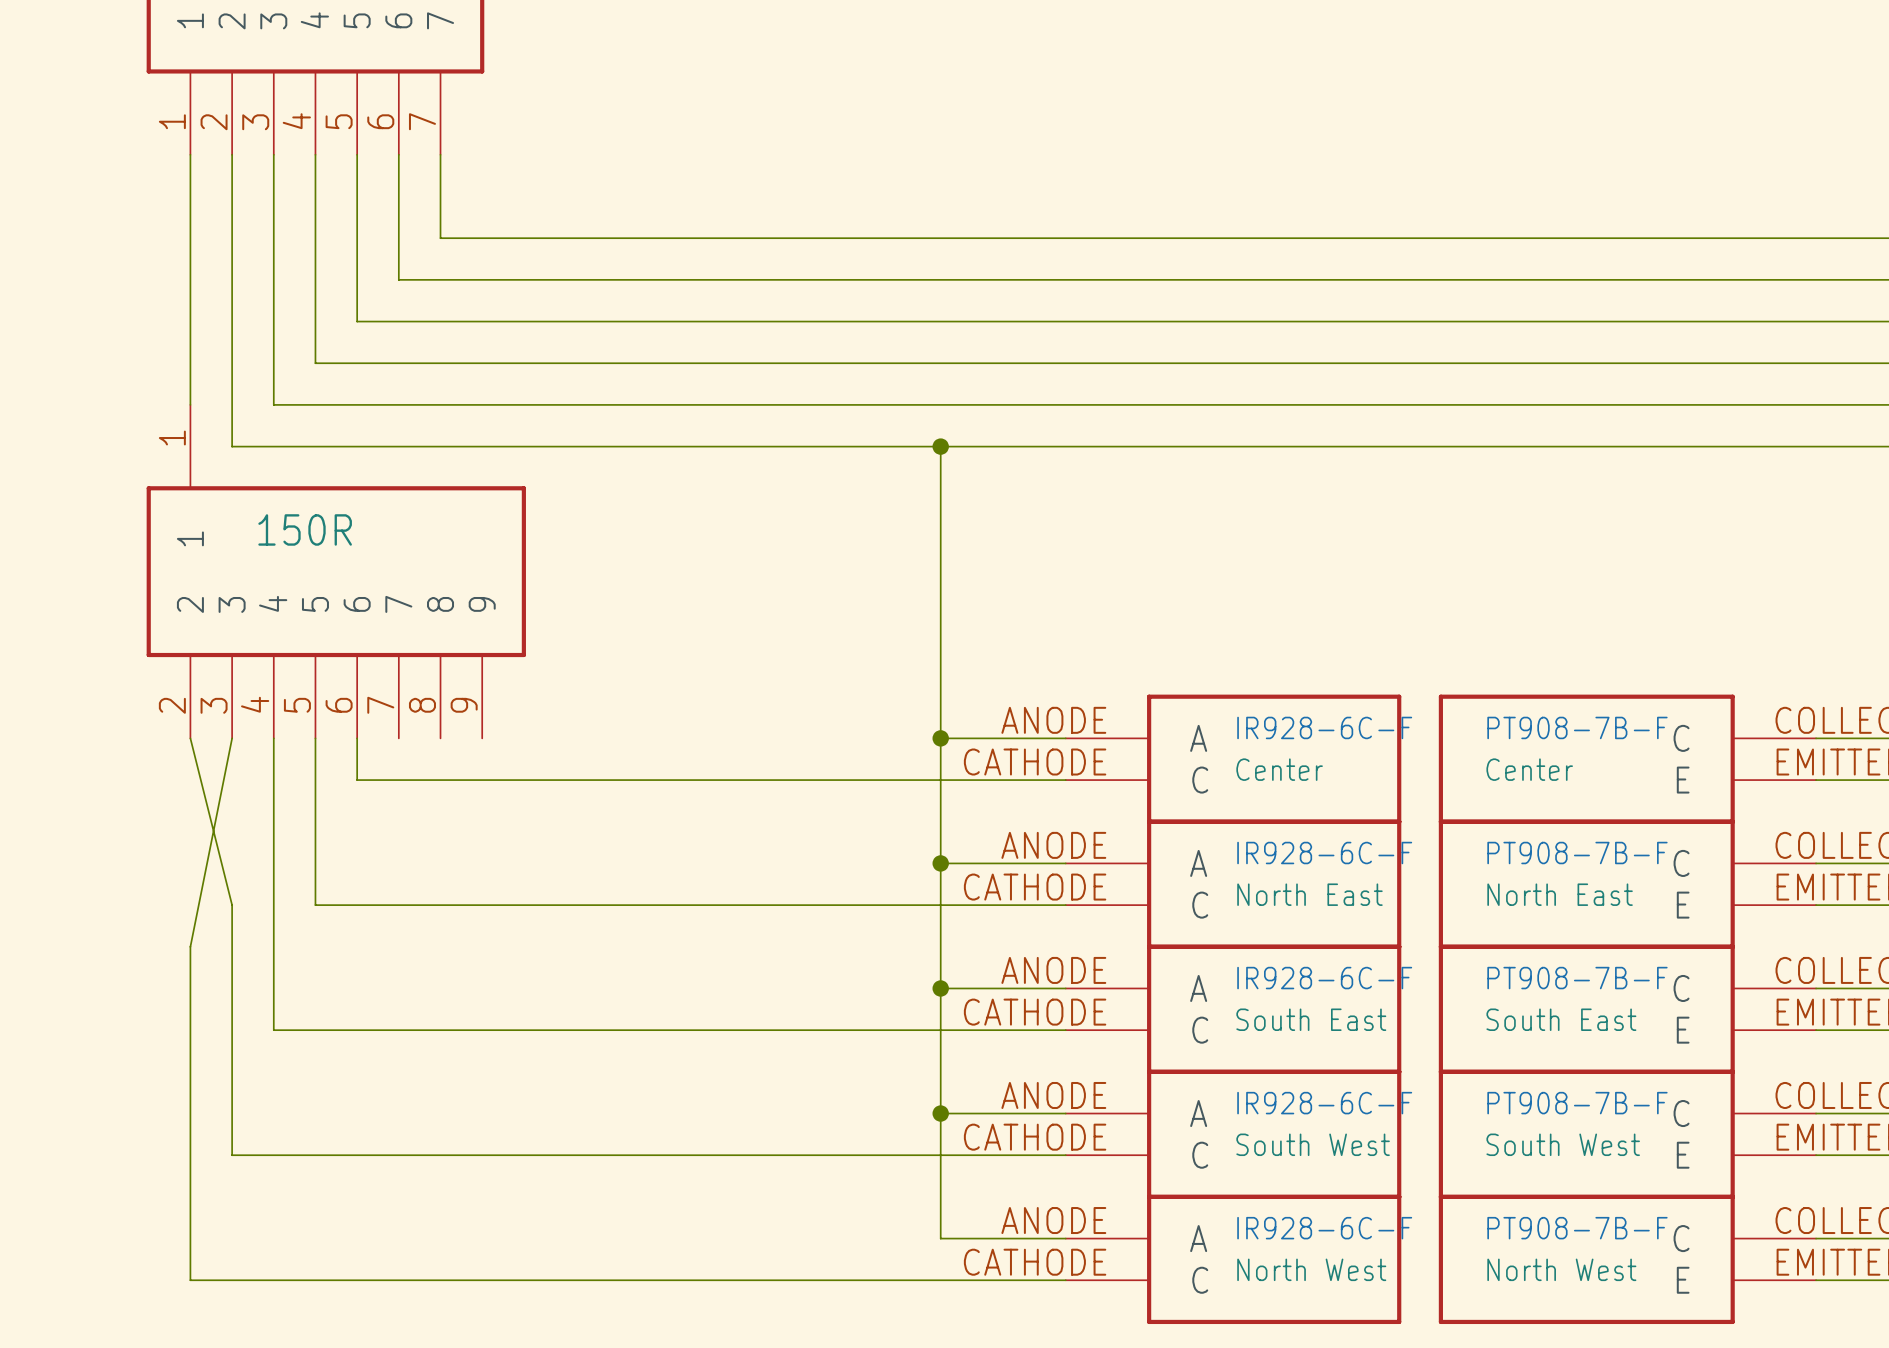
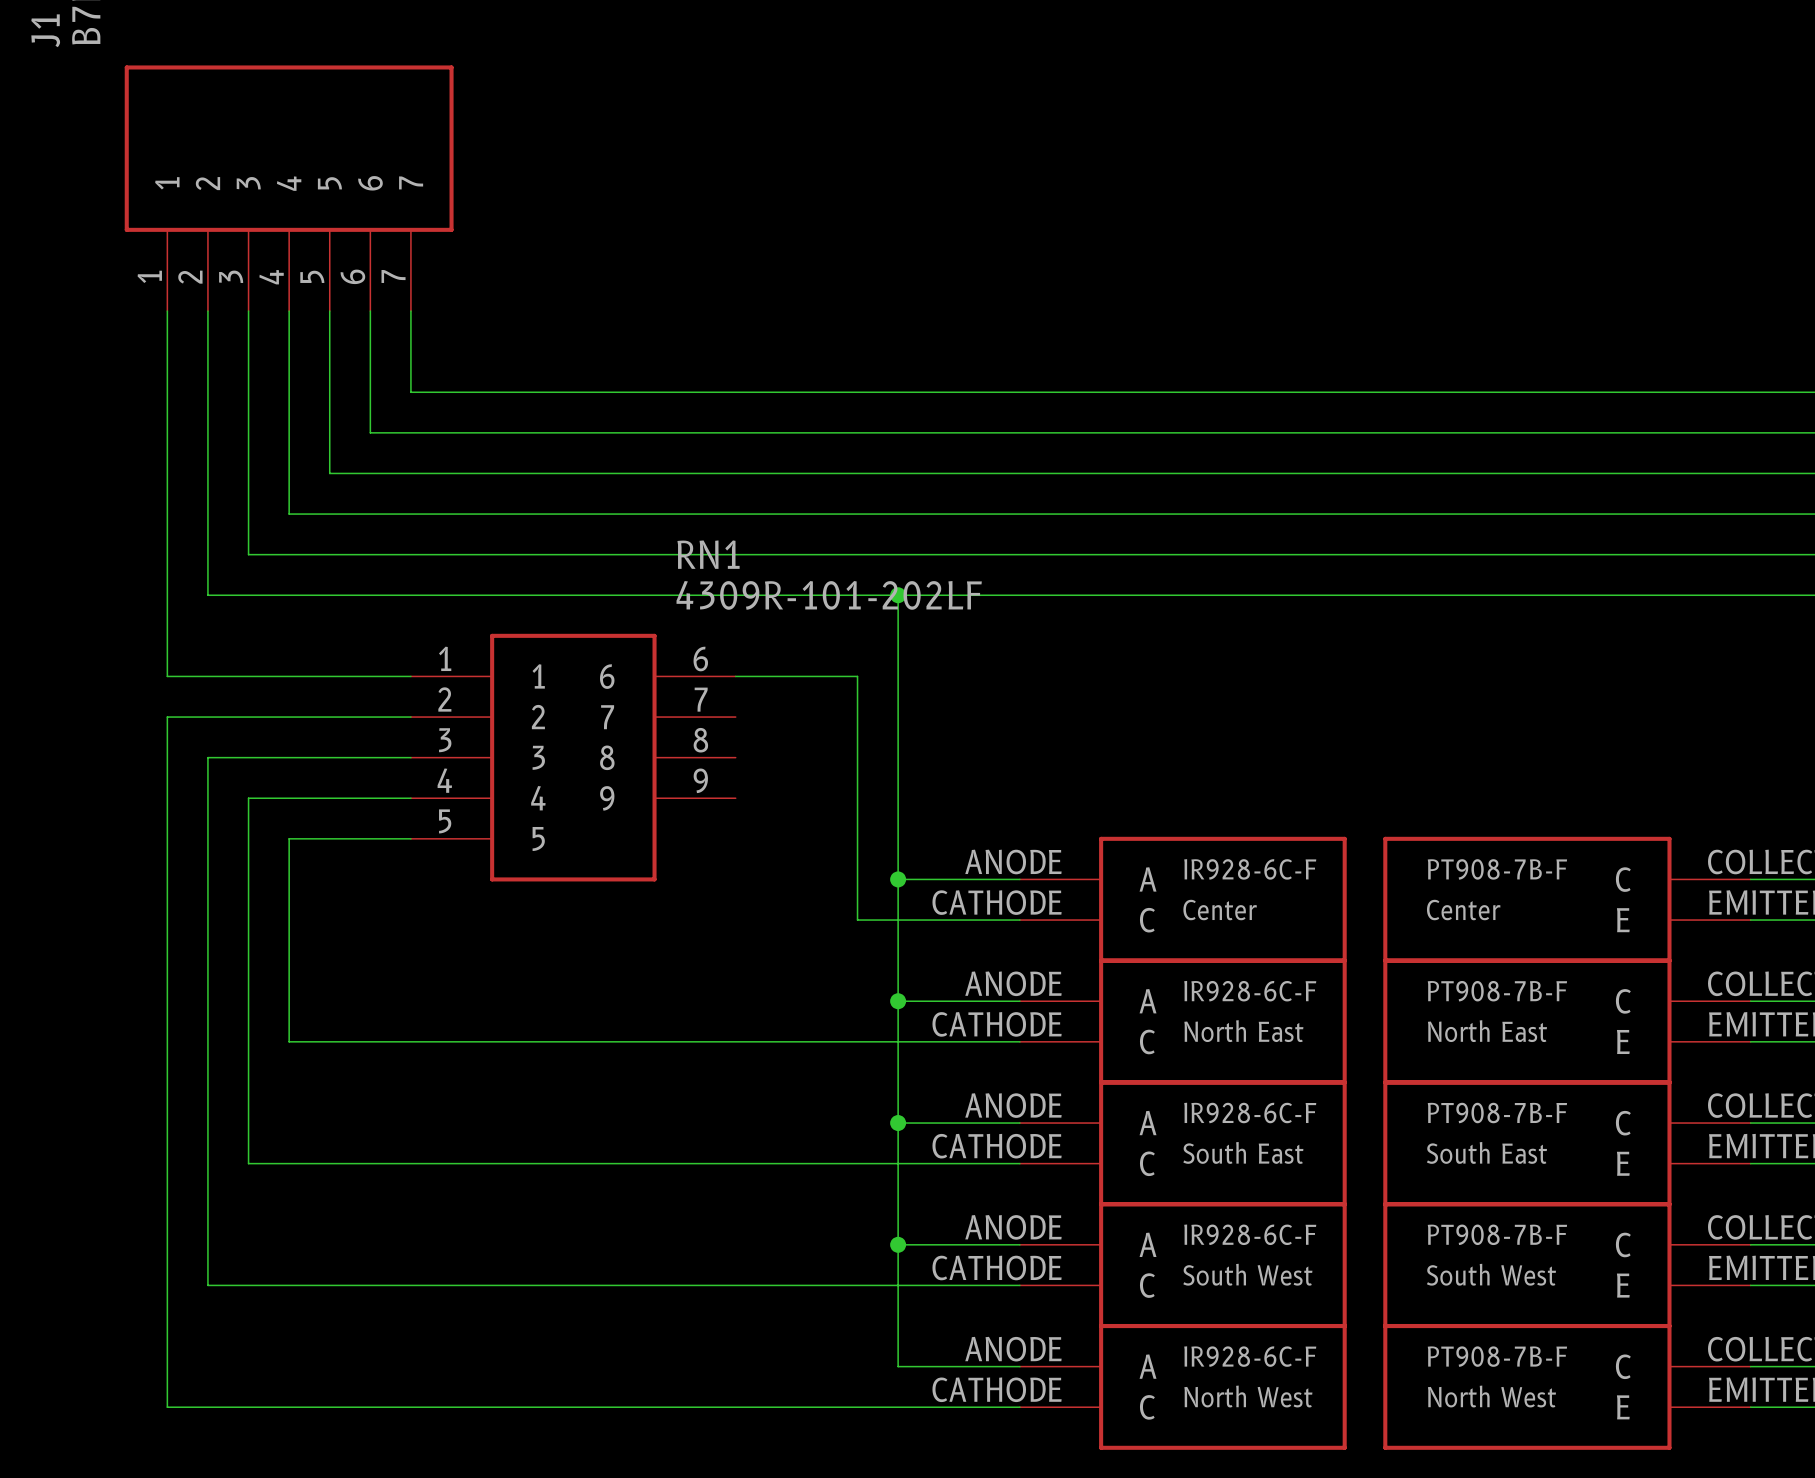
wire: none -> (167, 554) (167, 676) (410, 676)
part: 150R (336, 571) -> none
RN1: none -> 4309R-101-202LF (573, 757)
wire: none -> (410, 838) (289, 838) (289, 879)
wire: (190, 738) (232, 905) -> (410, 757) (207, 757) (207, 1041)
wire: (232, 738) (190, 946) -> (410, 717) (167, 717) (167, 1082)
wire: (357, 738) (357, 780) (899, 780) -> (735, 676) (857, 676) (857, 920)

